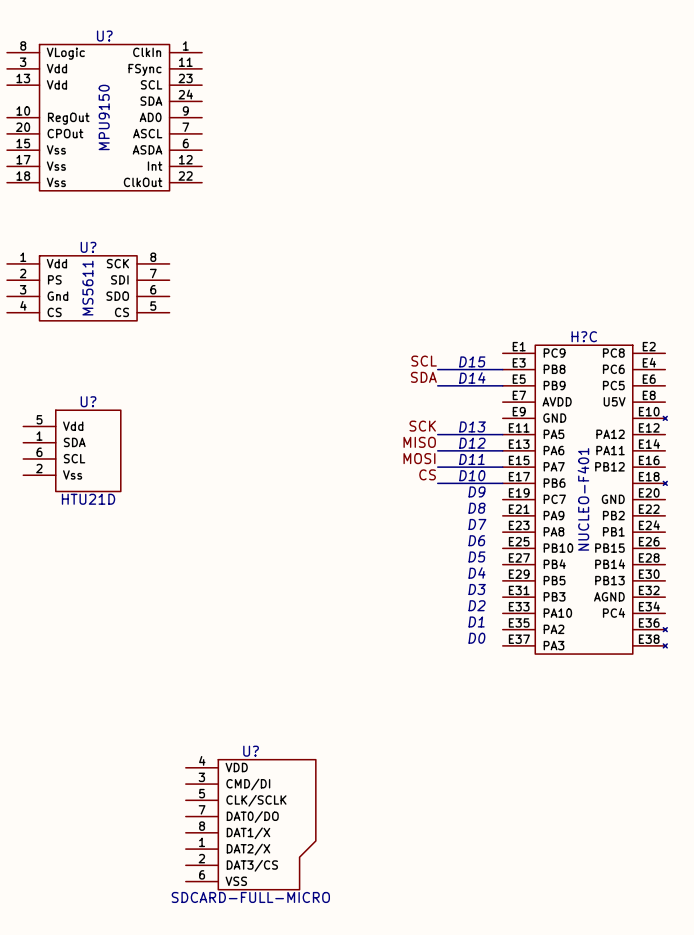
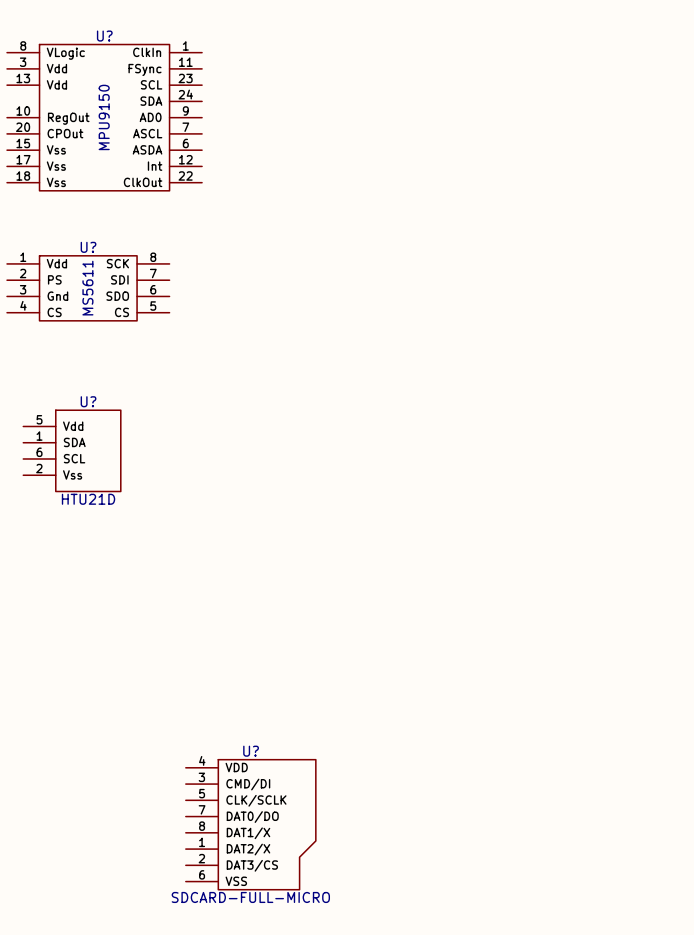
label: SCL (424, 361) -> none
text: D15 (472, 361) -> none
wire: (437, 369) (502, 369) -> none
label: SDA (423, 377) -> none
text: D14 (472, 377) -> none
wire: (437, 385) (502, 385) -> none
label: SCK (422, 426) -> none
text: D13 (472, 426) -> none
wire: (437, 434) (502, 434) -> none
label: MISO (419, 442) -> none
text: D12 (472, 443) -> none
wire: (437, 450) (502, 450) -> none
label: MOSI (419, 458) -> none
text: D11 (471, 459) -> none
wire: (437, 467) (502, 467) -> none
label: CS (427, 474) -> none
text: D10 (472, 475) -> none
wire: (437, 483) (502, 483) -> none
text: D9 (477, 491) -> none
H?C: NUCLEO-F401 (584, 499) -> none
text: D8 (477, 508) -> none
text: D7 (477, 524) -> none
text: D6 (476, 540) -> none
text: D5 (476, 556) -> none
text: D4 (477, 572) -> none
text: D3 (477, 589) -> none
text: D2 (477, 605) -> none
text: D1 (476, 621) -> none
text: D0 (476, 638) -> none

